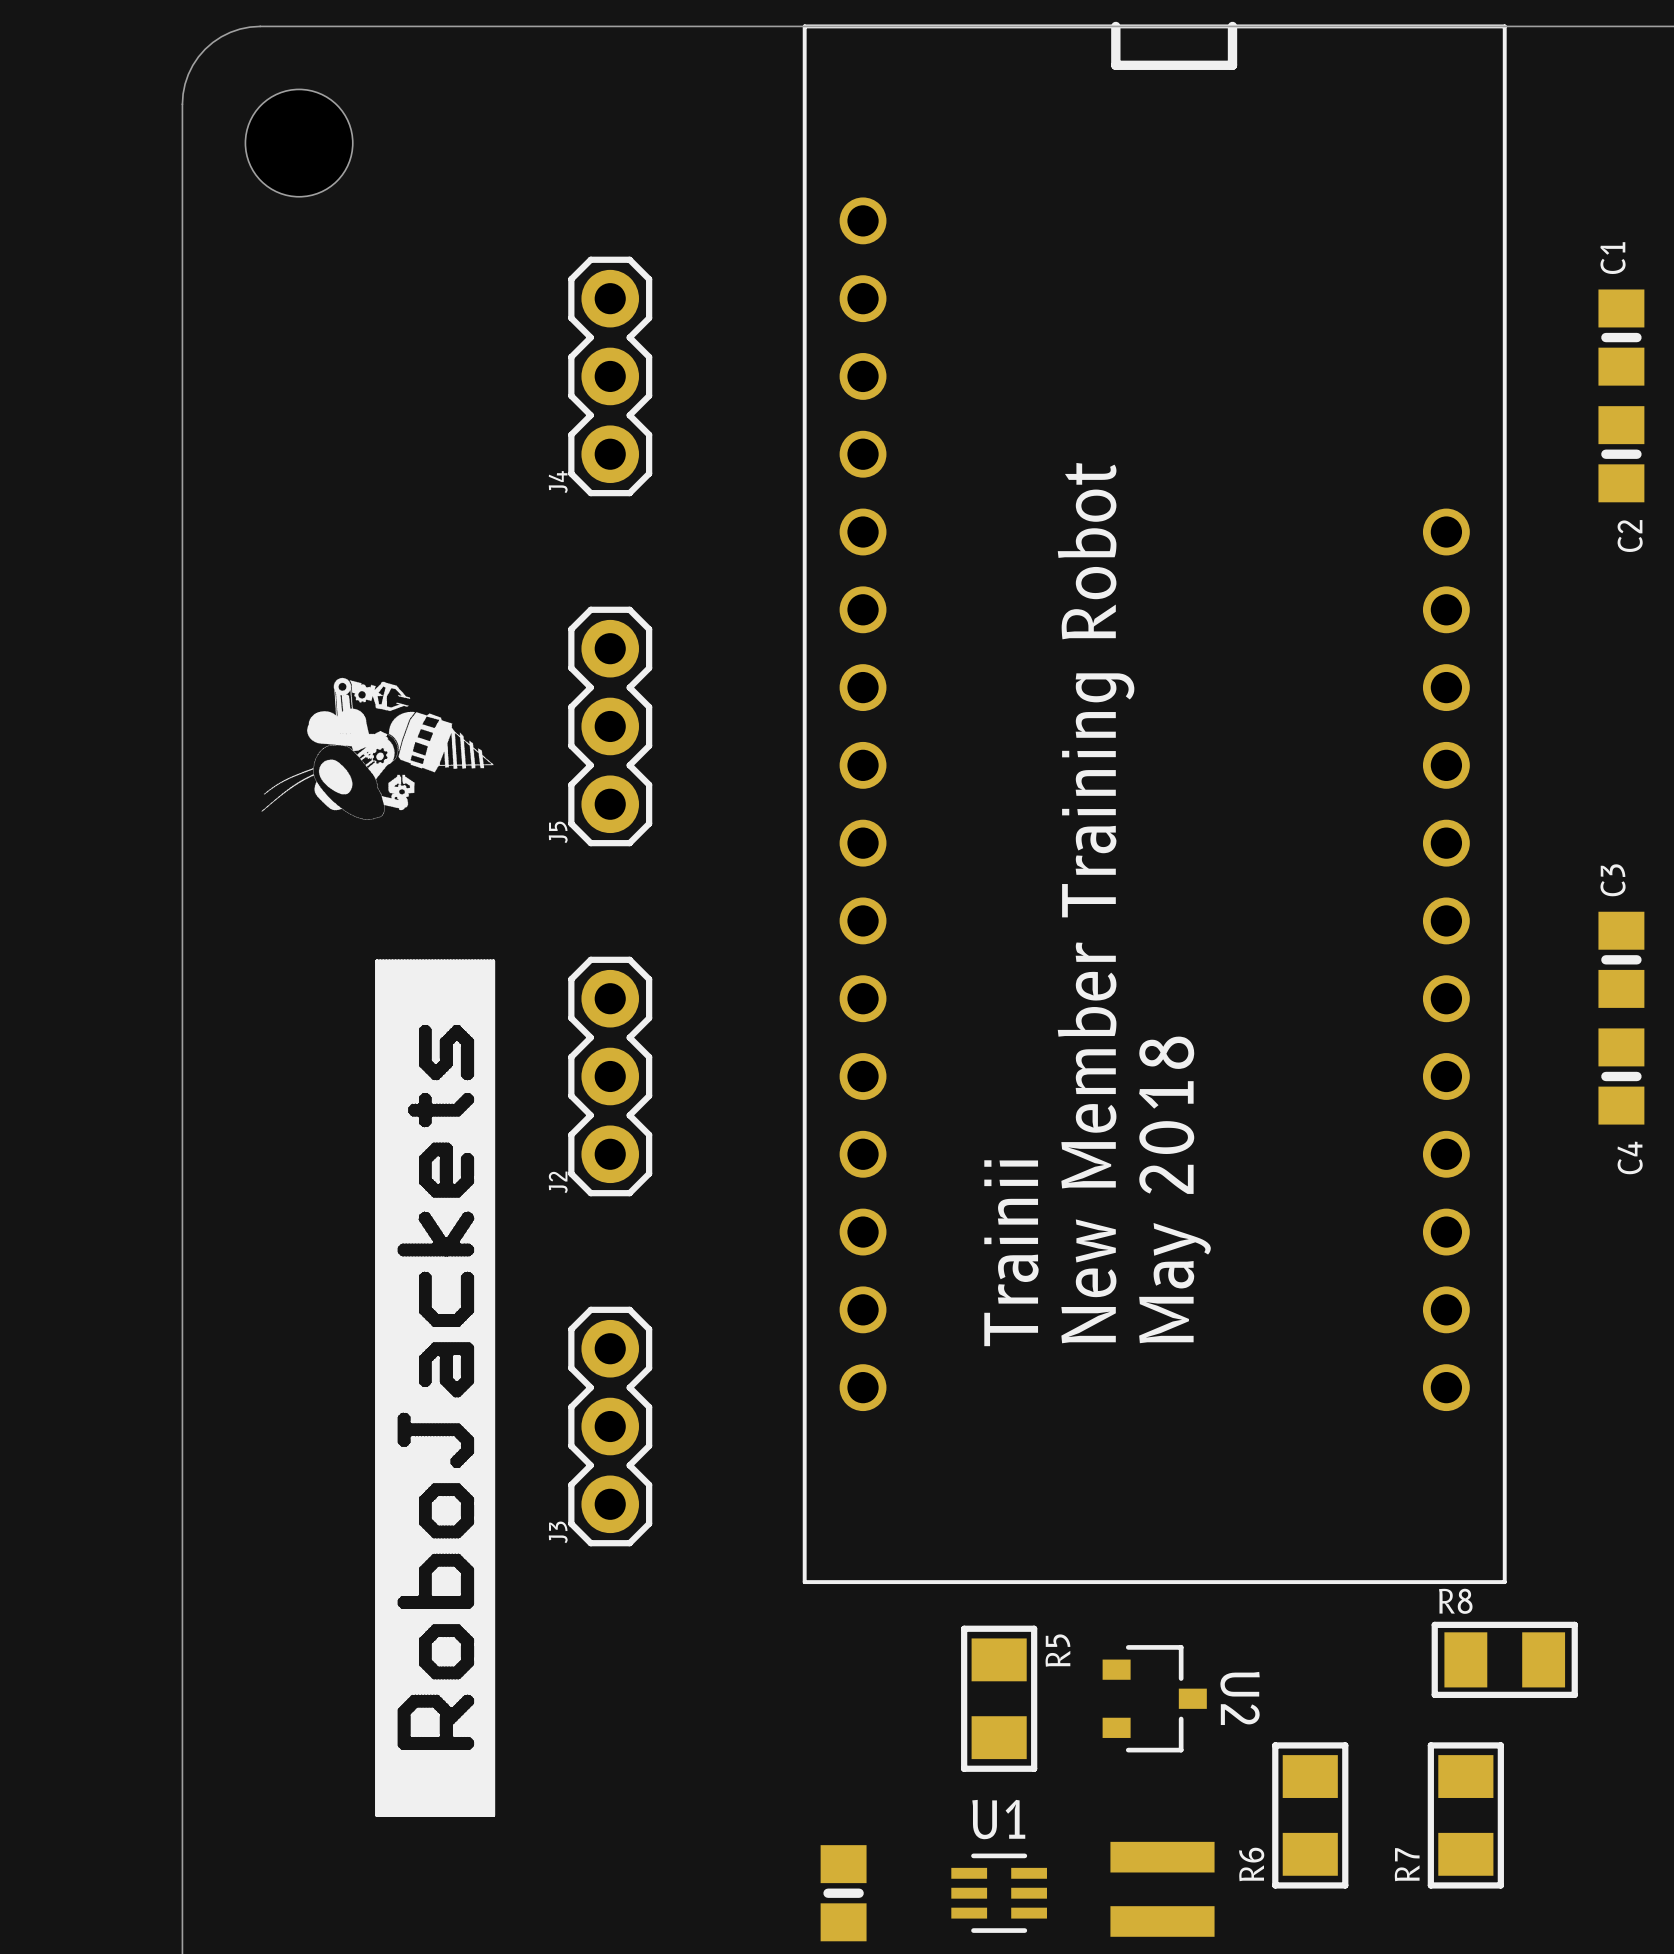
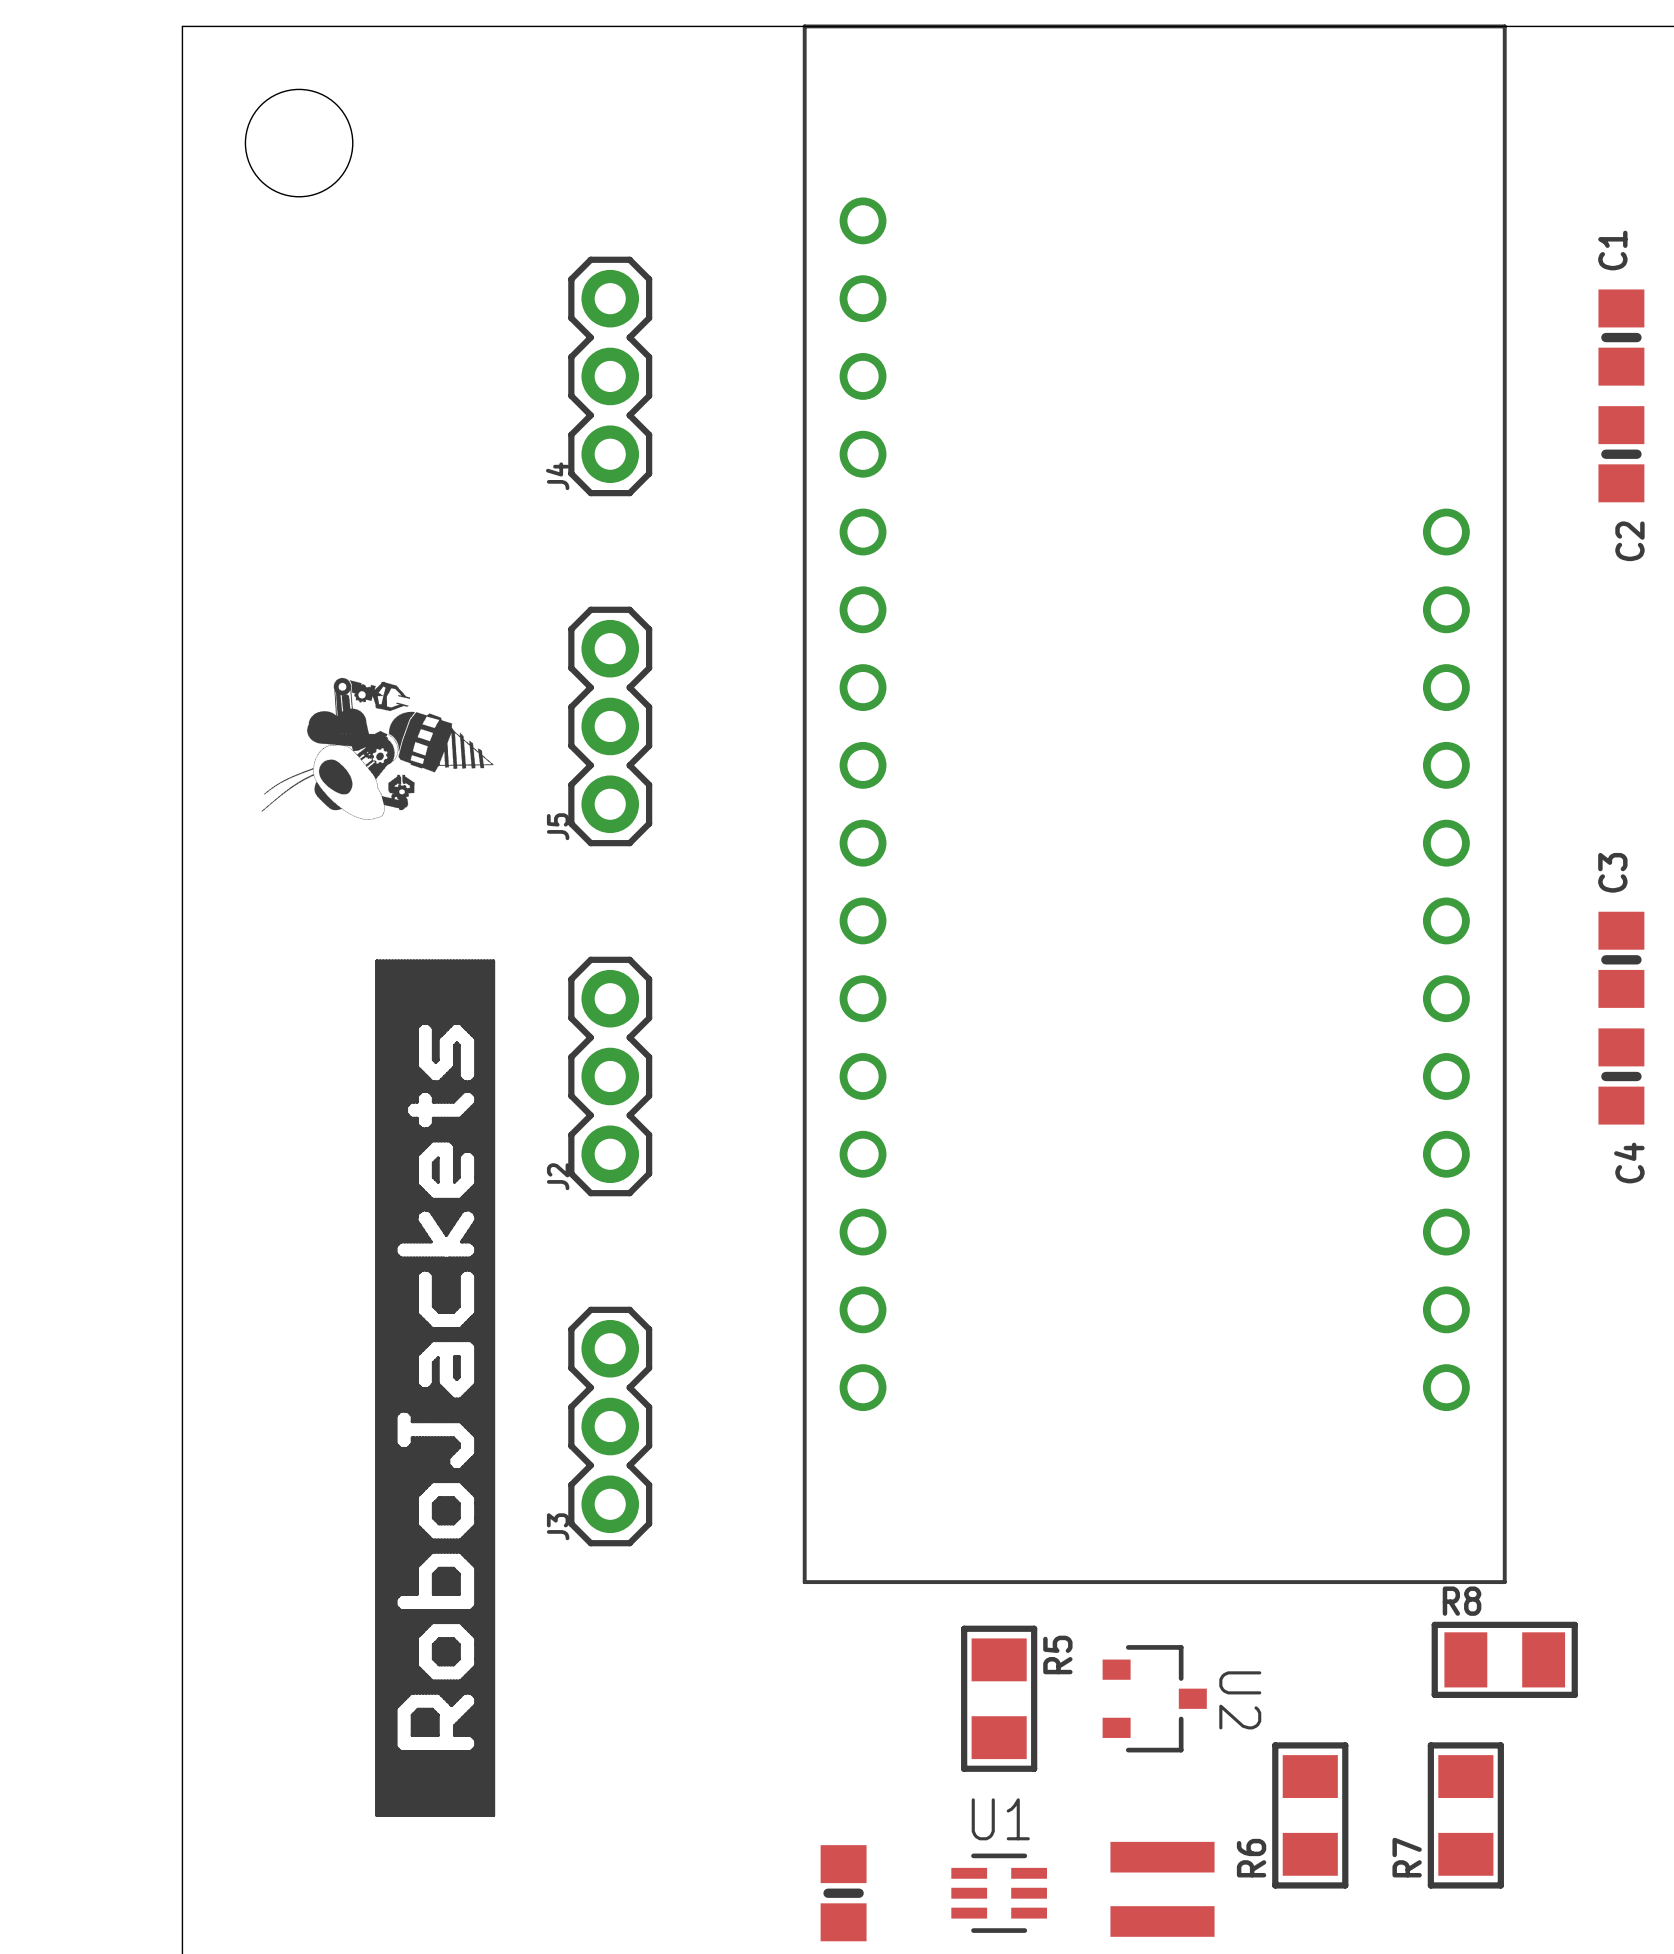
board edge: (260, 26) (230, 32) (205, 49) (188, 74) (182, 104) -> (260, 26) (182, 26) (182, 104)
line: (1115, 26) (1115, 65) (1232, 65) (1232, 26) -> none
text: New Member Training Robot (1096, 903) -> none
text: May 2018 (1174, 1189) -> none
text: Trainii (1011, 1253) -> none

